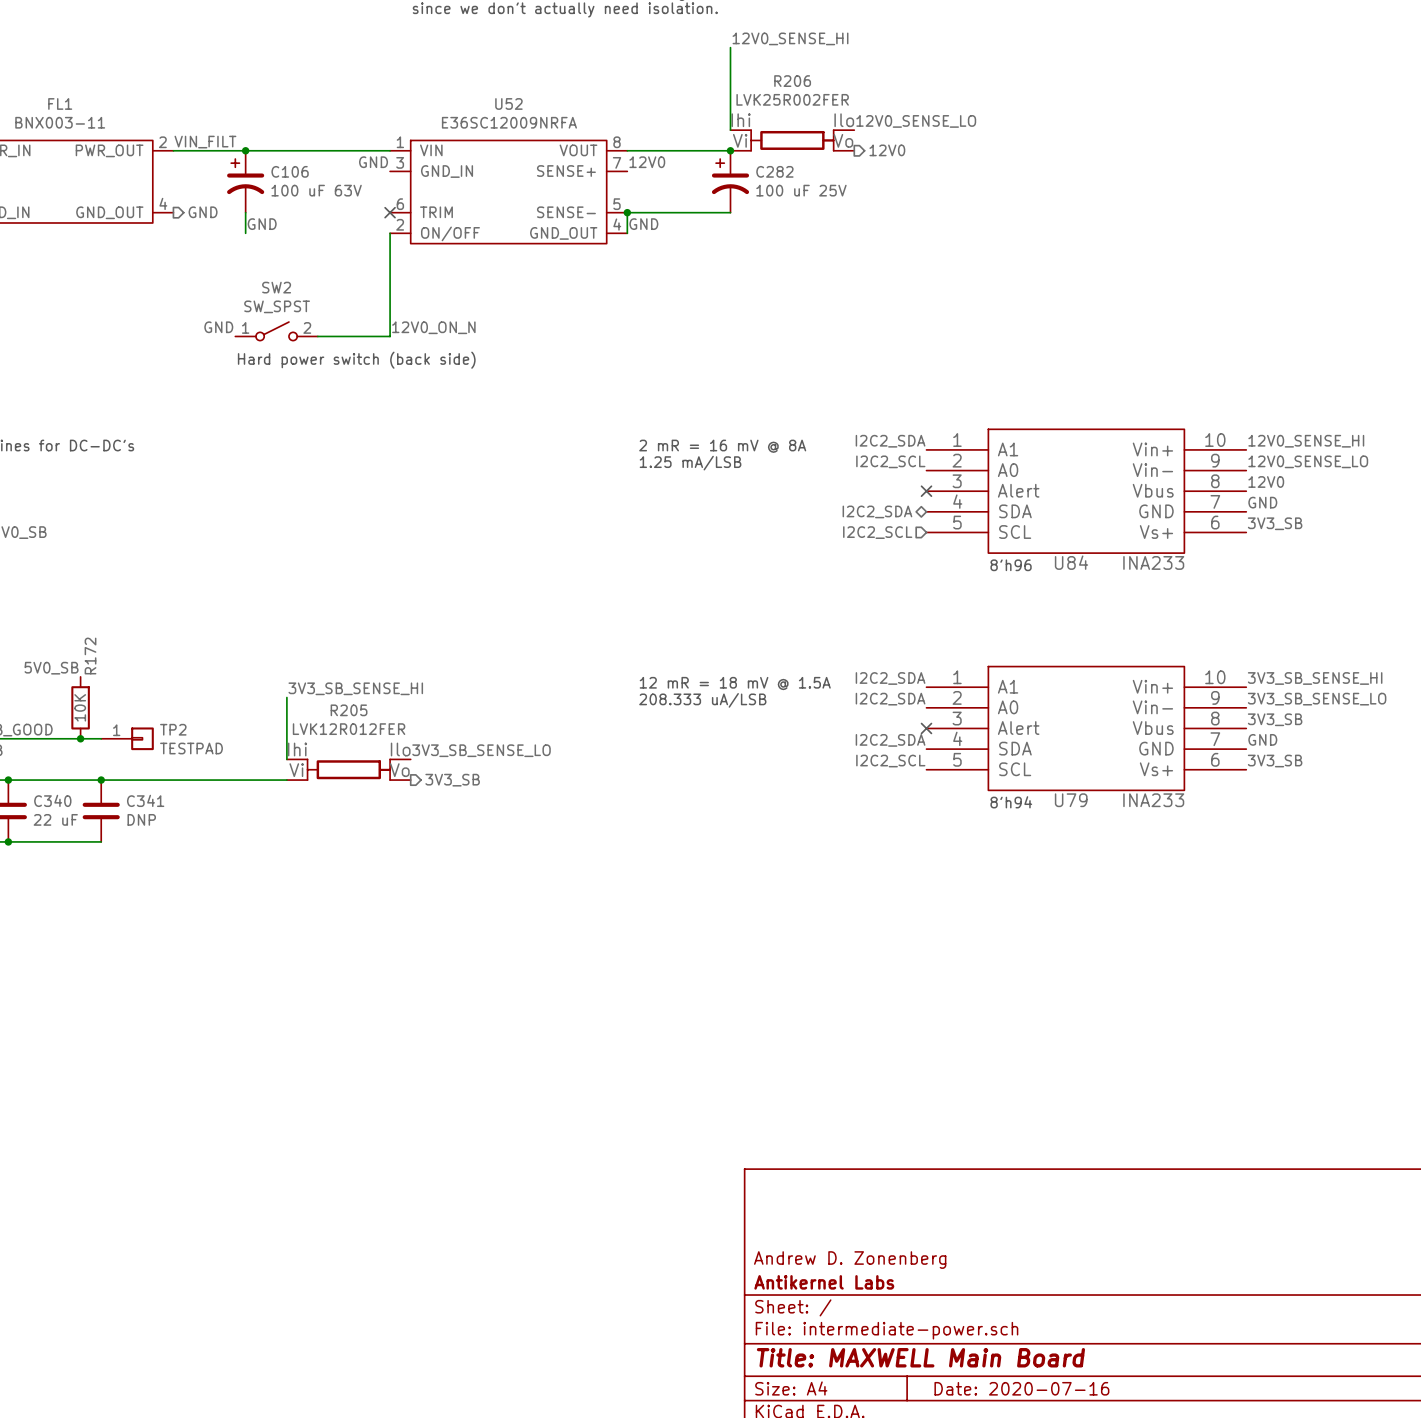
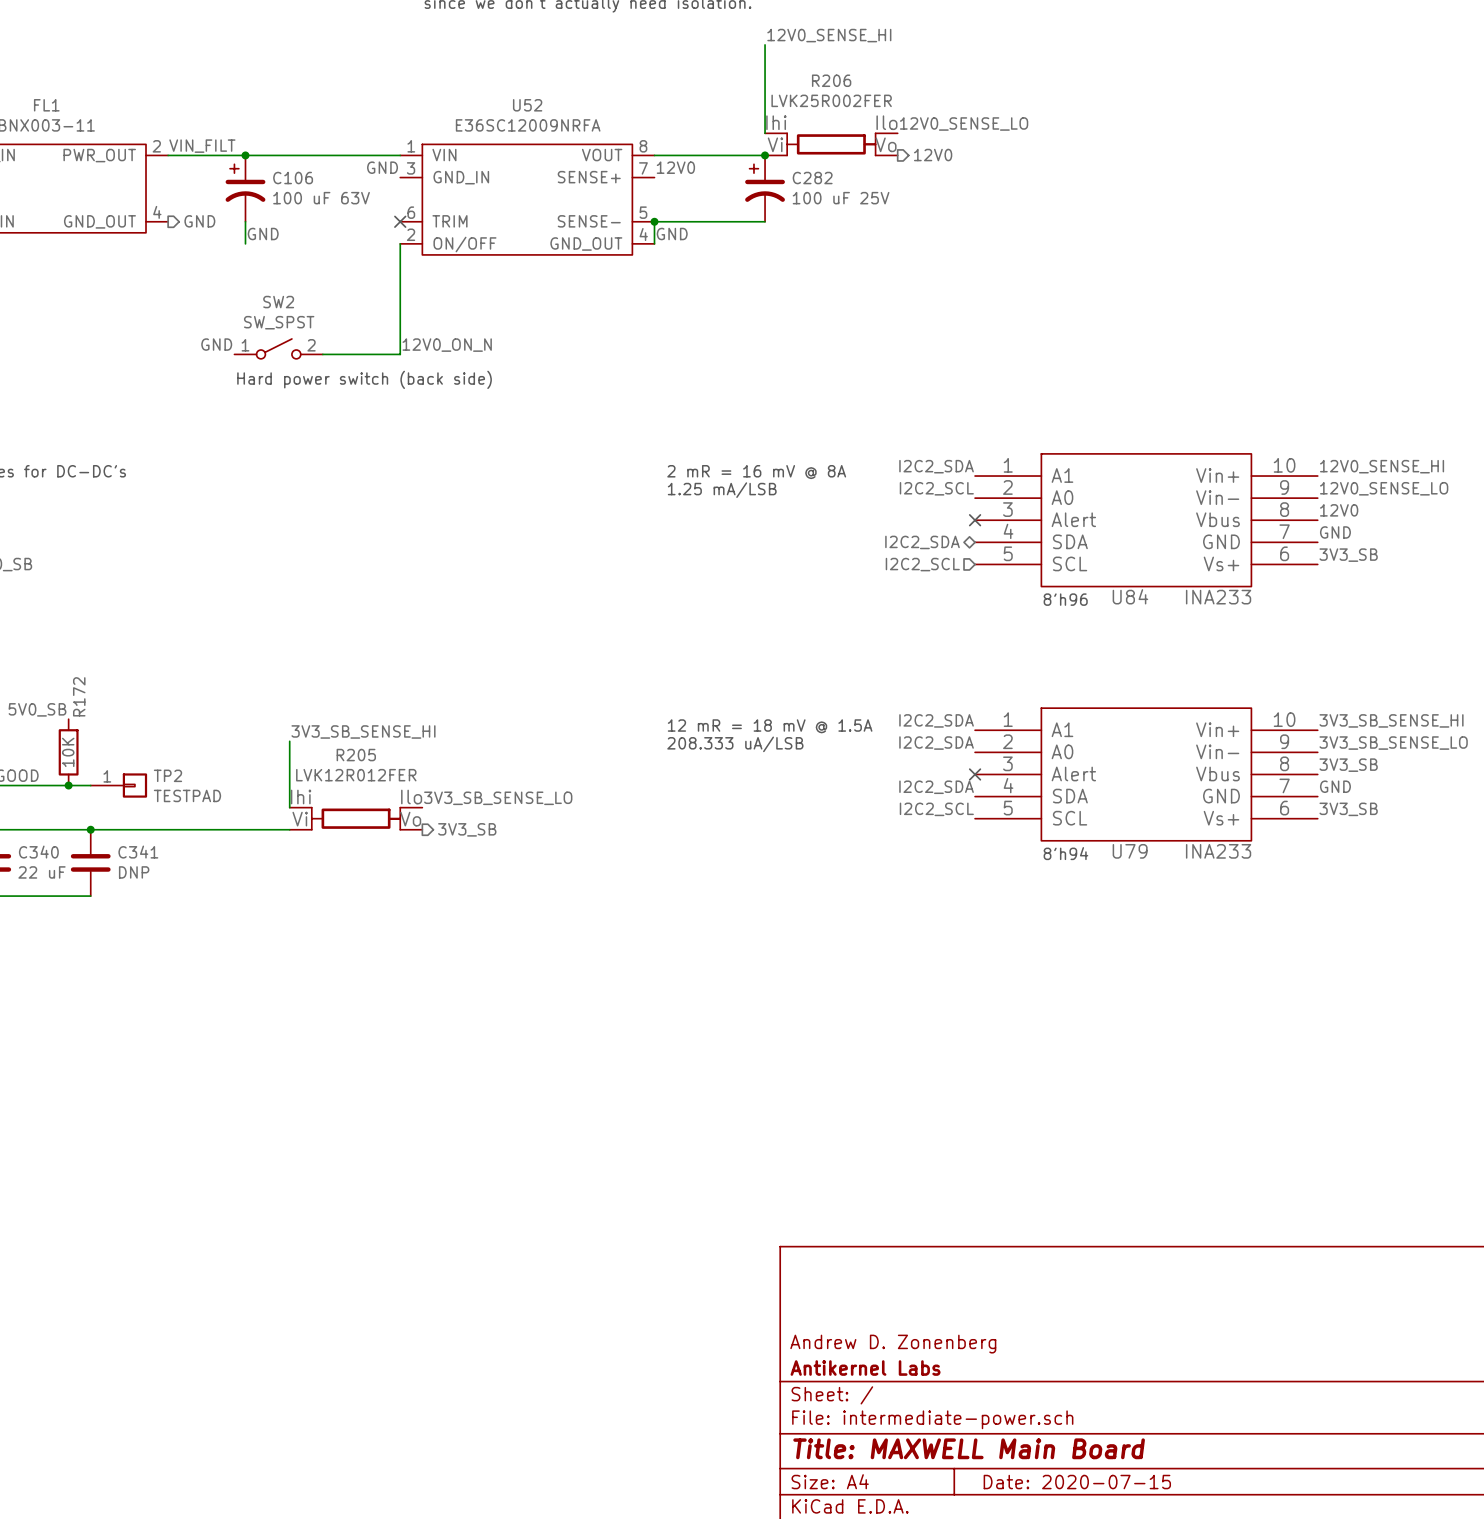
title block: Date: 2020-07-16 (1021, 1388) -> Date: 2020-07-15 (1077, 1482)

